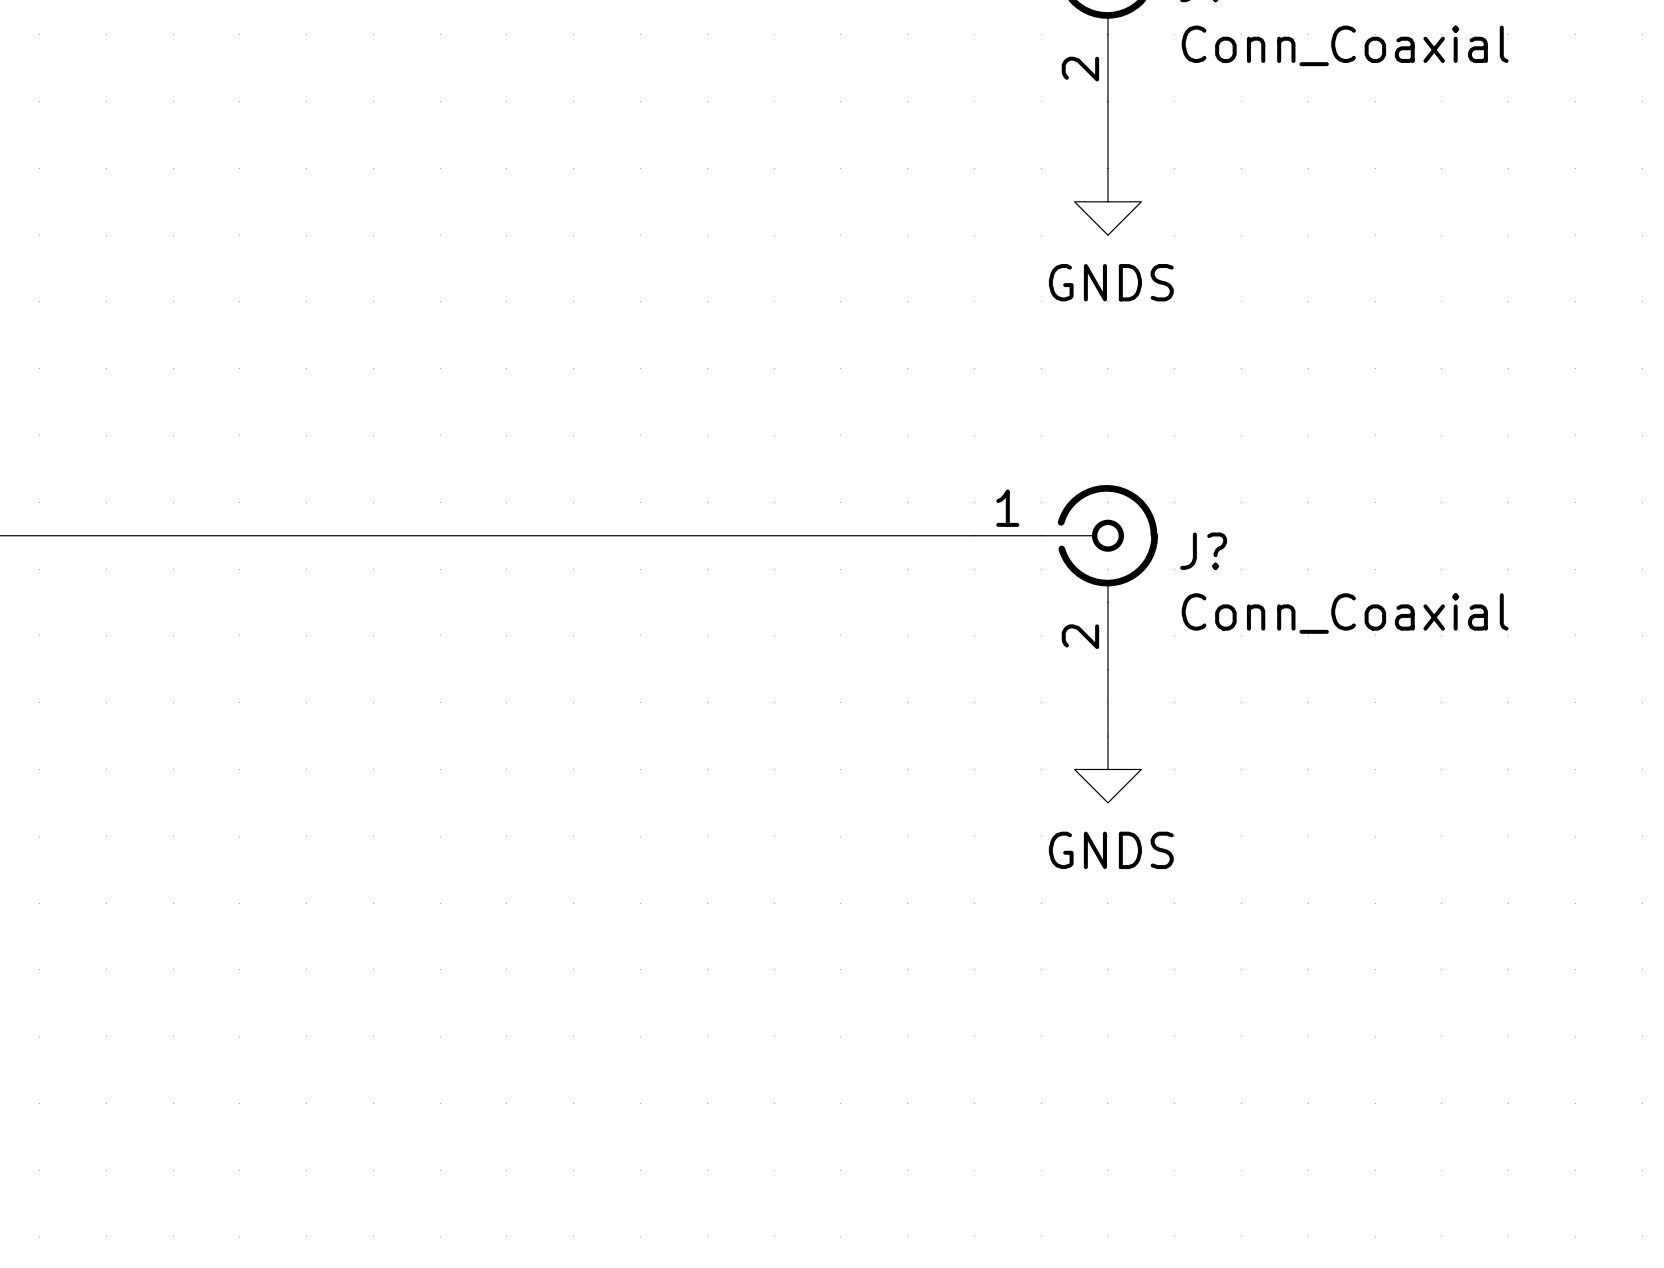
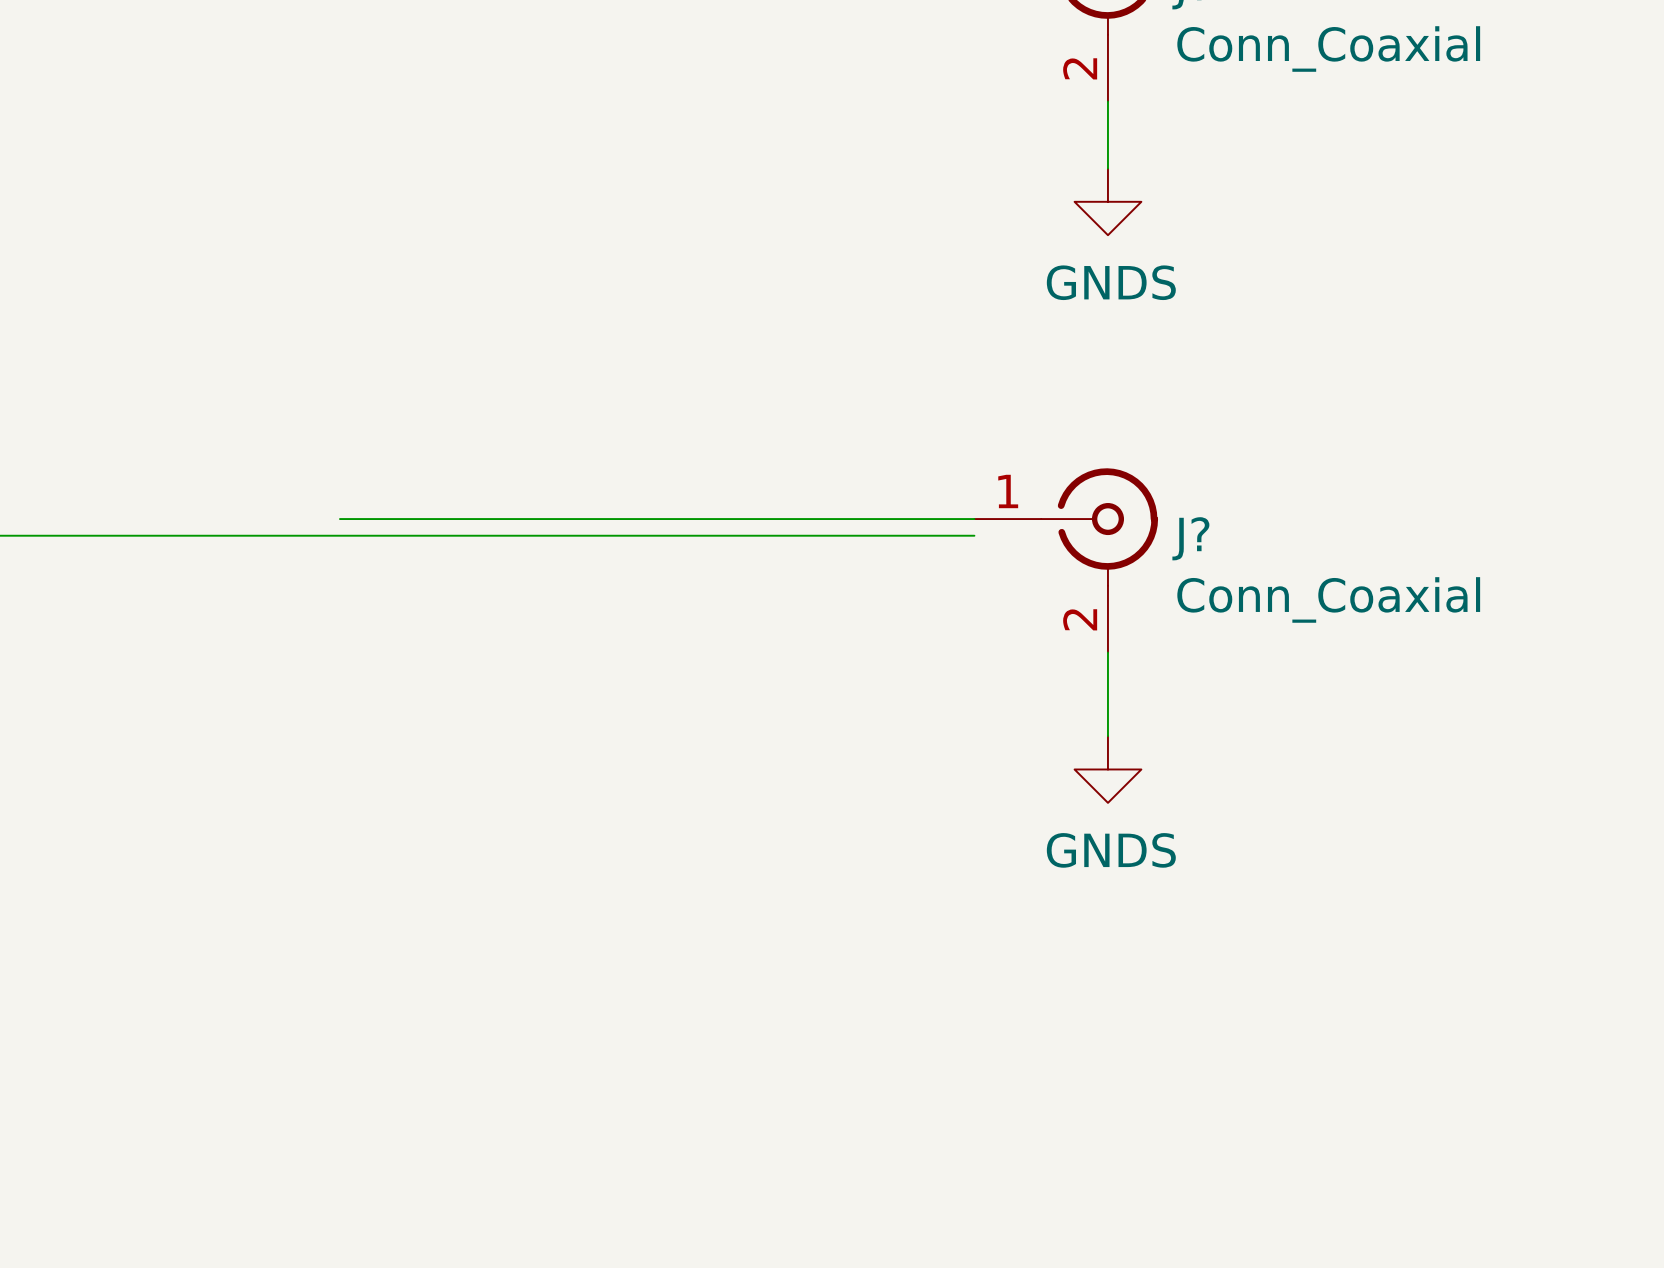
wire: none -> (339, 519) (974, 519)
J? position: (1066, 577) -> (1066, 560)

